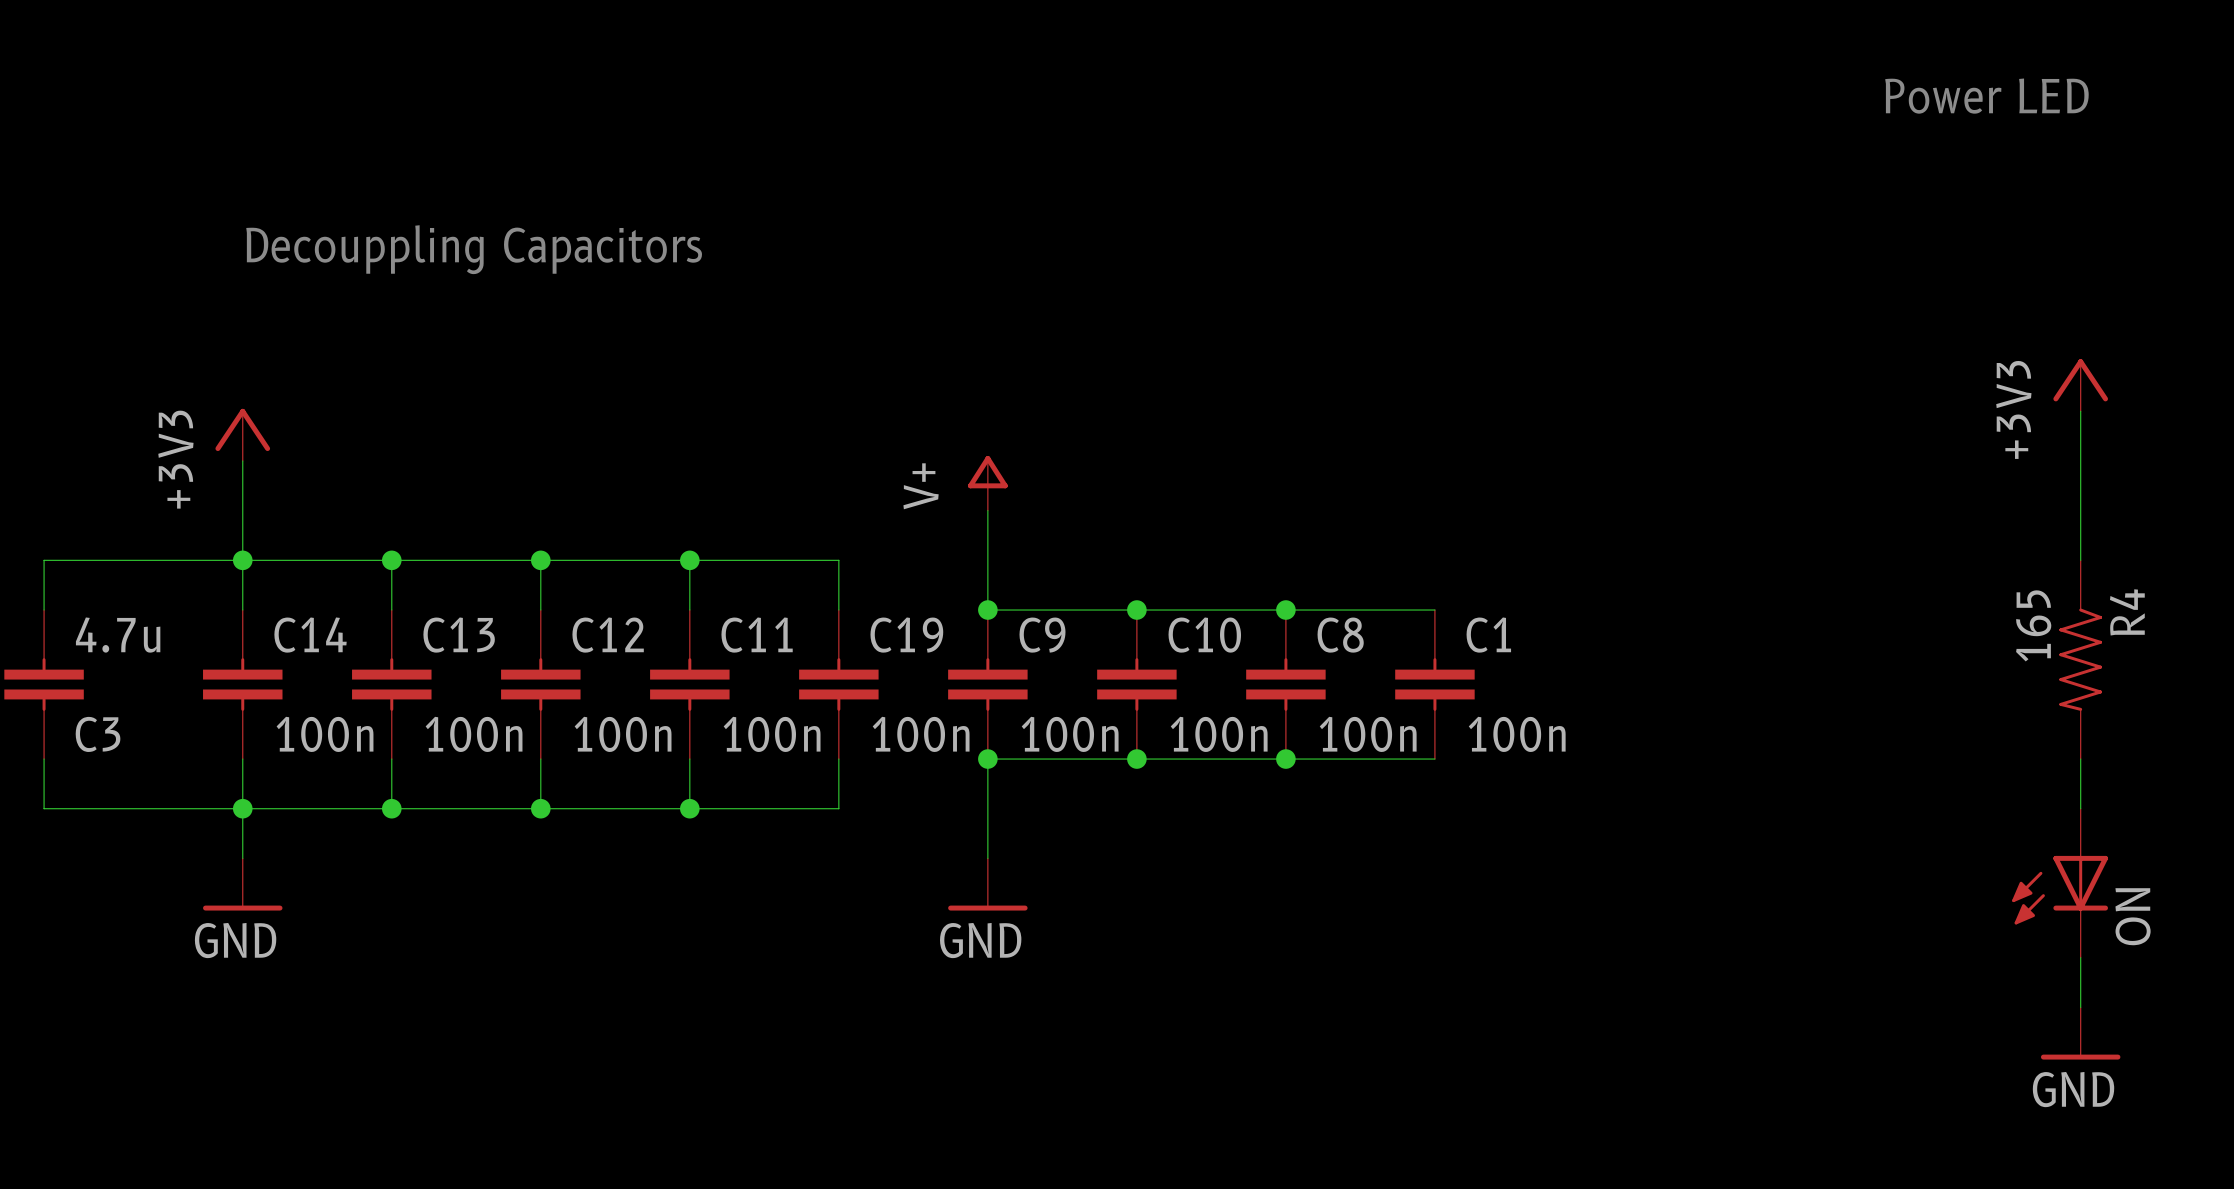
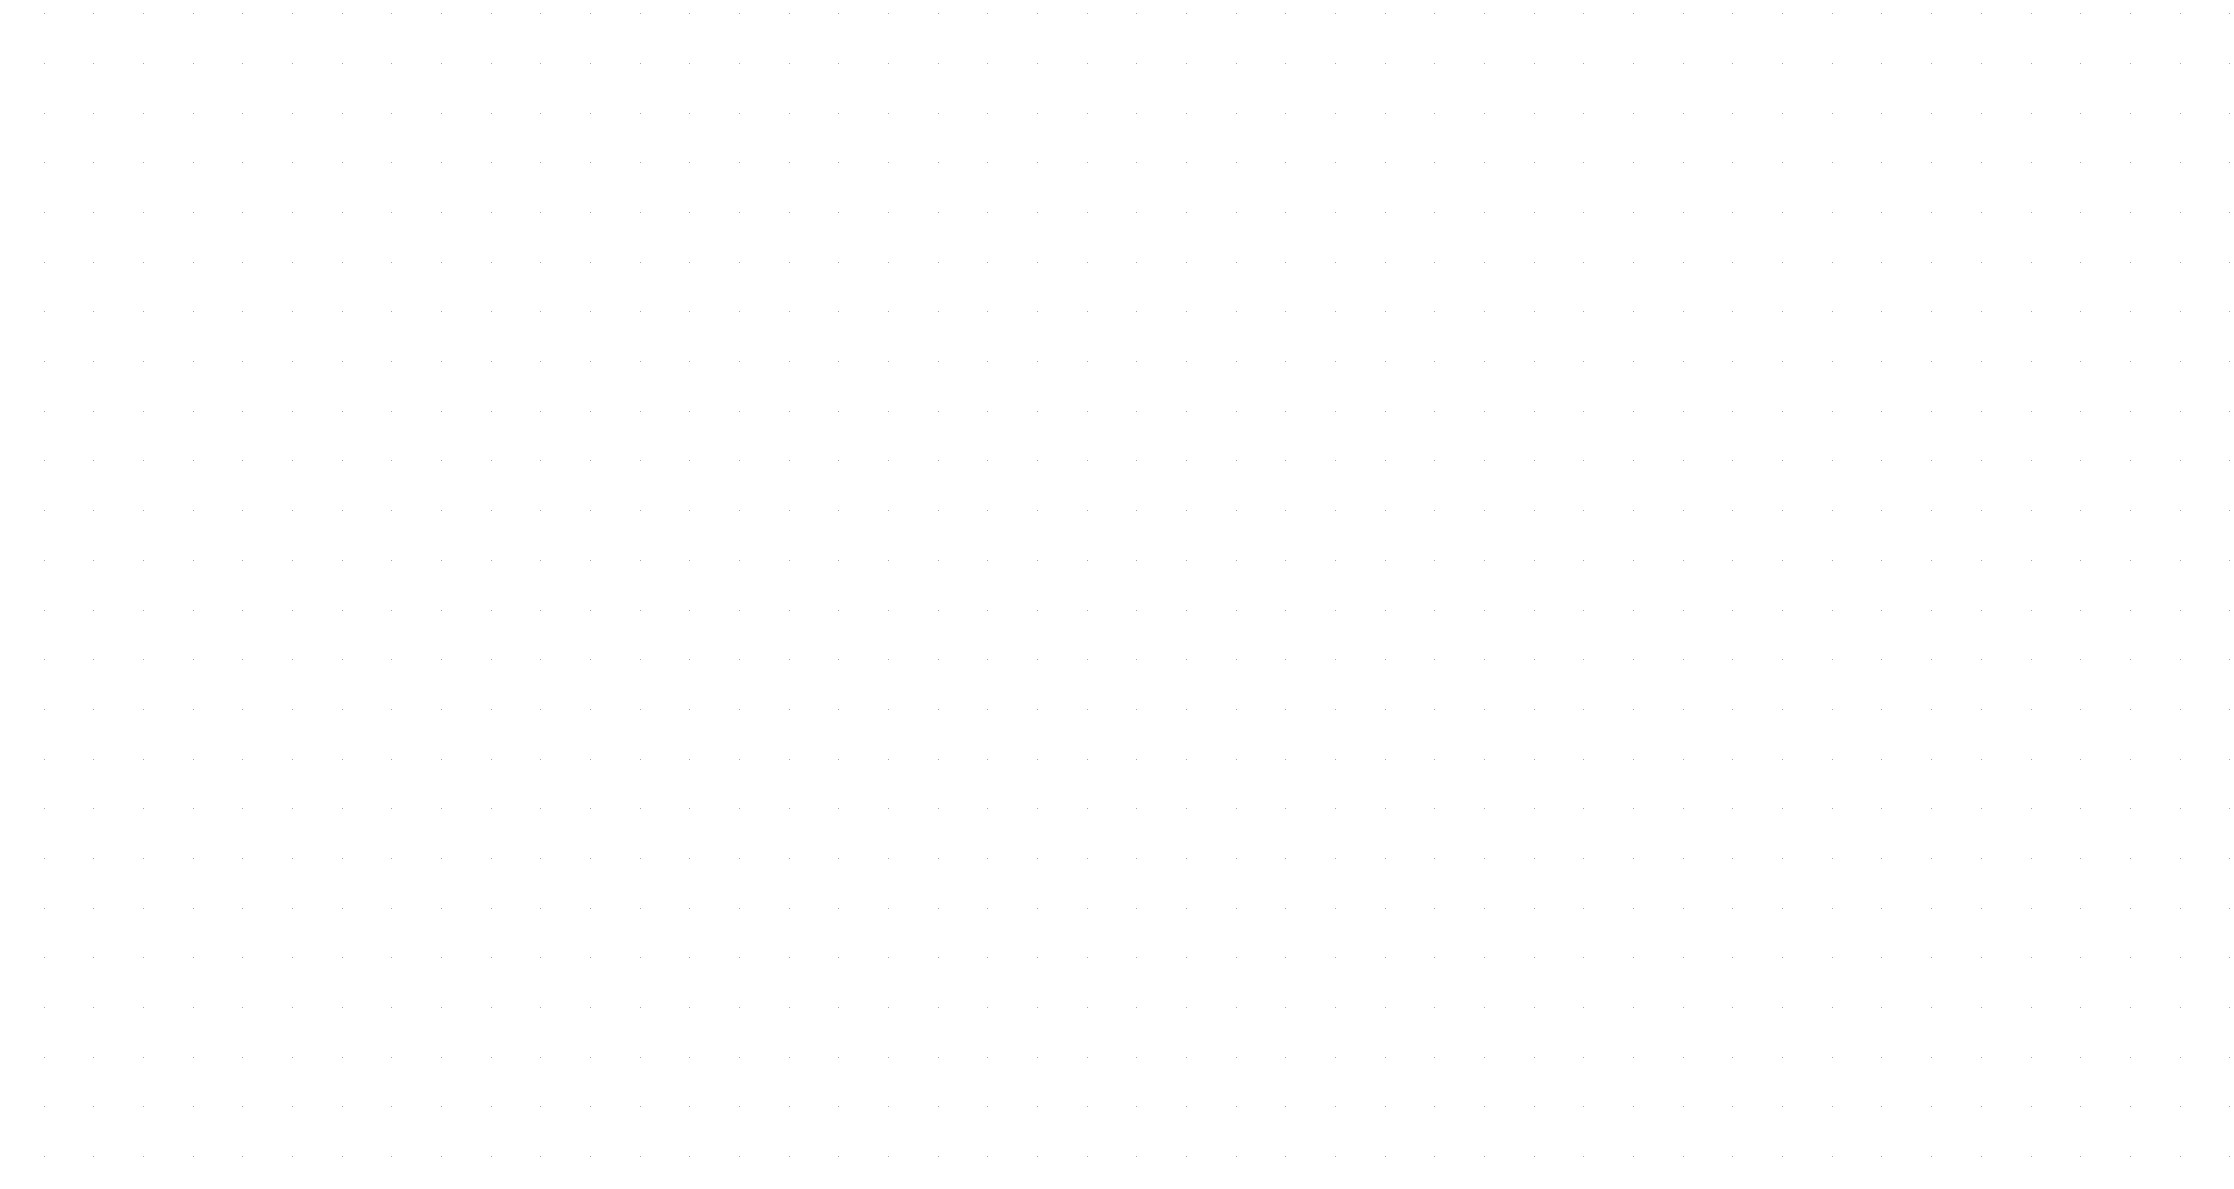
text: Power LED (1986, 96) -> none
text: Decouppling Capacitors (474, 249) -> none
power symbol: +3V3 (2080, 385) -> none
wire: (2080, 411) (2080, 560) -> none
power symbol: +3V3 (242, 434) -> none
wire: (242, 460) (242, 610) -> none
power symbol: V+ (987, 483) -> none
wire: (987, 510) (987, 610) (1434, 610) -> none
junction: (242, 560) -> none
wire: (391, 560) (391, 610) -> none
junction: (391, 560) -> none
wire: (540, 560) (540, 610) -> none
junction: (540, 560) -> none
wire: (689, 560) (689, 610) -> none
junction: (689, 560) -> none
wire: (44, 610) (44, 560) (838, 560) (838, 610) -> none
junction: (987, 610) -> none
junction: (1136, 610) -> none
junction: (1285, 610) -> none
R4: 165 (2080, 659) -> none
C3: 4.7u (44, 684) -> none
C14: 100n (242, 684) -> none
C13: 100n (391, 684) -> none
C12: 100n (540, 684) -> none
C11: 100n (689, 684) -> none
C19: 100n (838, 684) -> none
C9: 100n (987, 684) -> none
C10: 100n (1136, 684) -> none
C8: 100n (1285, 684) -> none
C1: 100n (1434, 684) -> none
wire: (44, 759) (44, 808) (838, 808) (838, 759) -> none
wire: (242, 759) (242, 858) -> none
wire: (391, 759) (391, 808) -> none
wire: (540, 759) (540, 808) -> none
wire: (689, 759) (689, 808) -> none
junction: (987, 759) -> none
junction: (1136, 759) -> none
junction: (1285, 759) -> none
wire: (1434, 759) (987, 759) (987, 858) -> none
wire: (2080, 759) (2080, 808) -> none
junction: (242, 808) -> none
junction: (391, 808) -> none
junction: (540, 808) -> none
junction: (689, 808) -> none
ON: (2060, 883) -> none
power symbol: GND (242, 884) -> none
power symbol: GND (987, 884) -> none
wire: (2080, 957) (2080, 1007) -> none
power symbol: GND (2080, 1033) -> none

